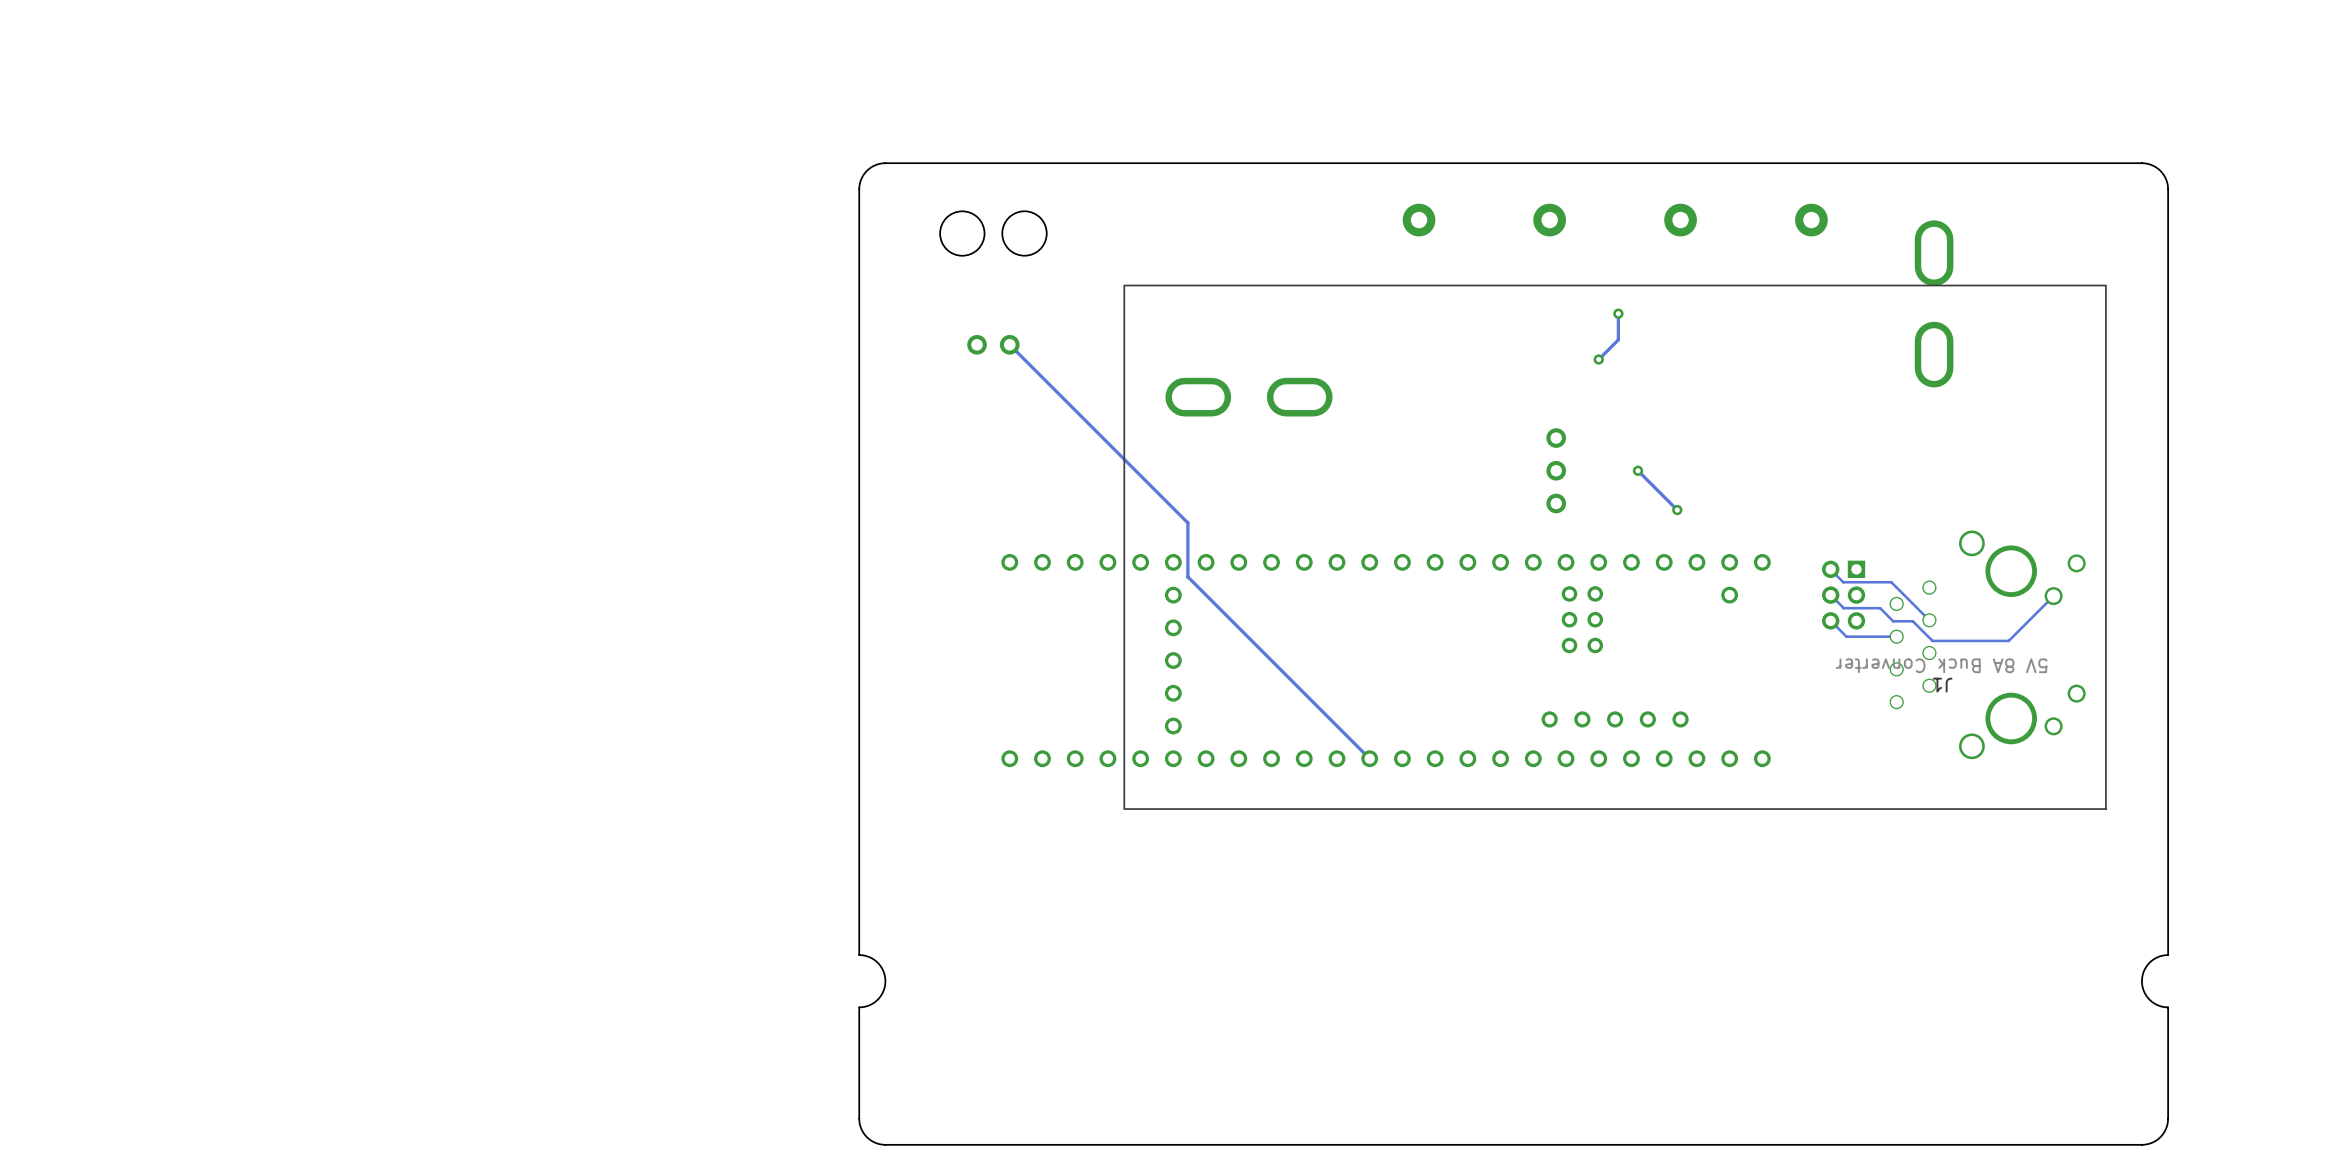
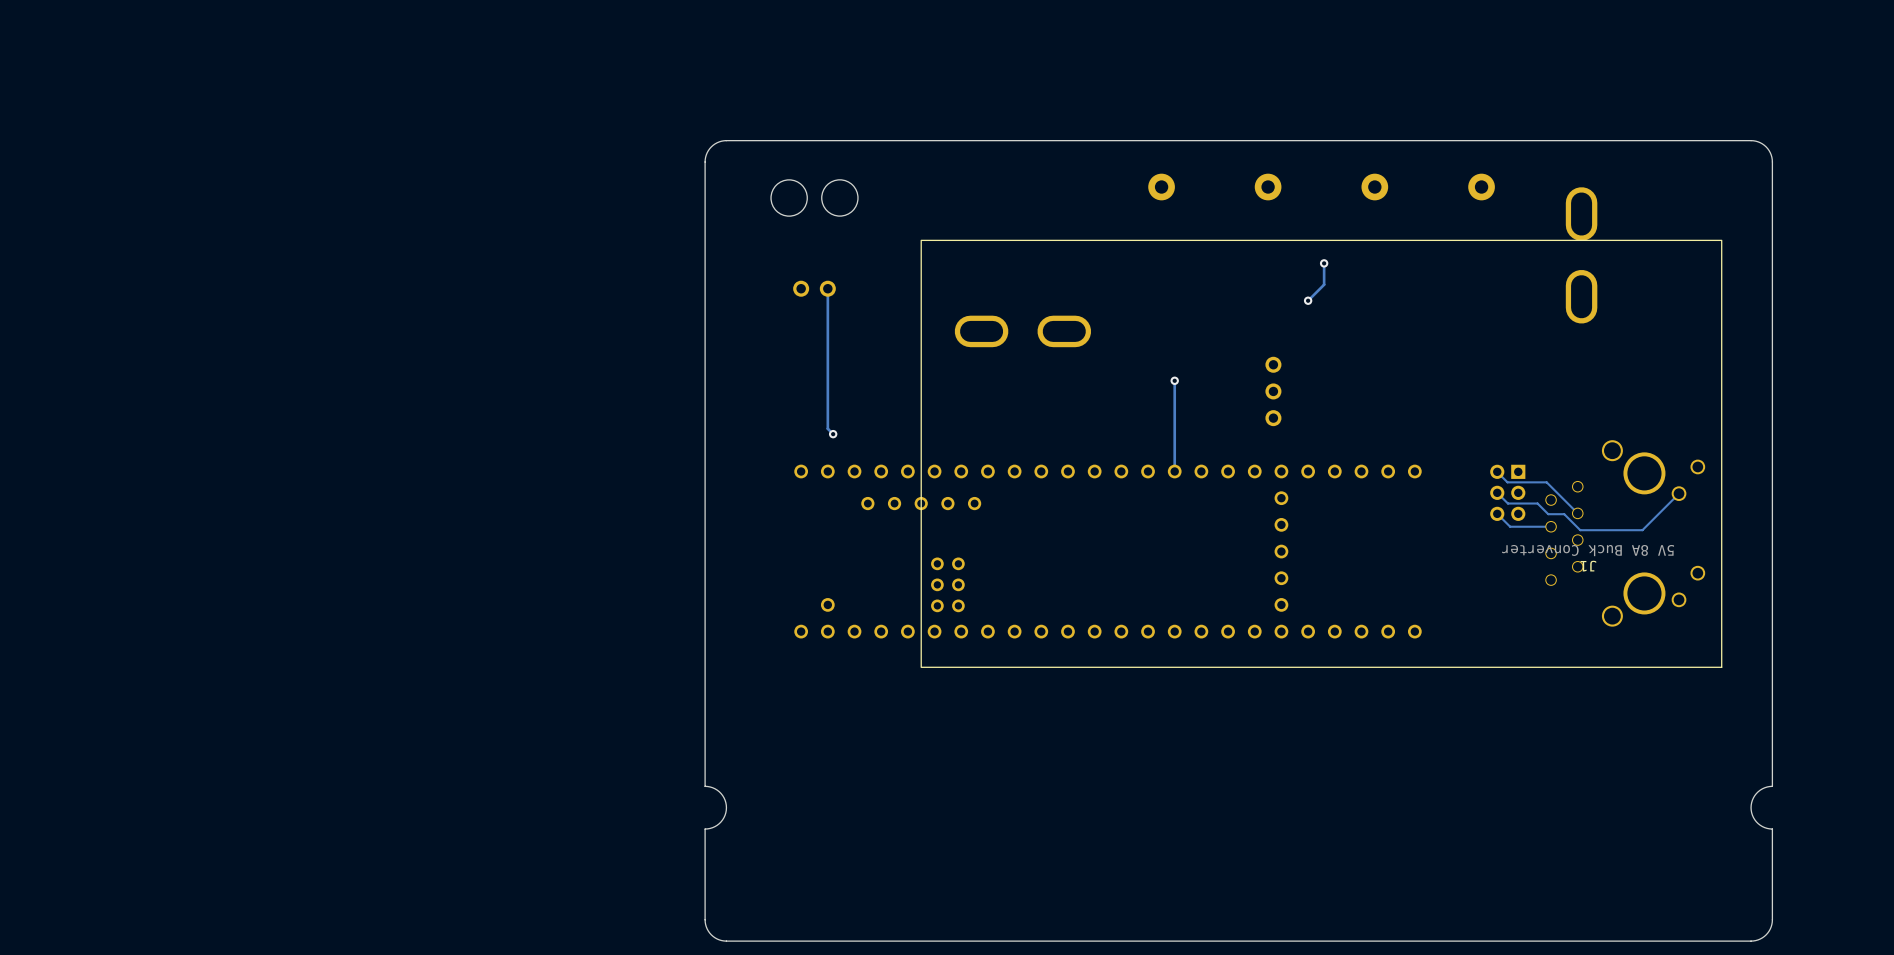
track: (1009, 344) (1187, 522) (1187, 576) (1369, 758) -> (827, 288) (827, 428) (833, 434)
track: none -> (1174, 380) (1174, 471)
via: none -> (1174, 380)
track: (1638, 470) (1677, 510) -> none
via: (1638, 470) -> none
via: (1677, 510) -> none
via: none -> (833, 434)
part rotation: 0° (1386, 660) -> 180° (1108, 551)

